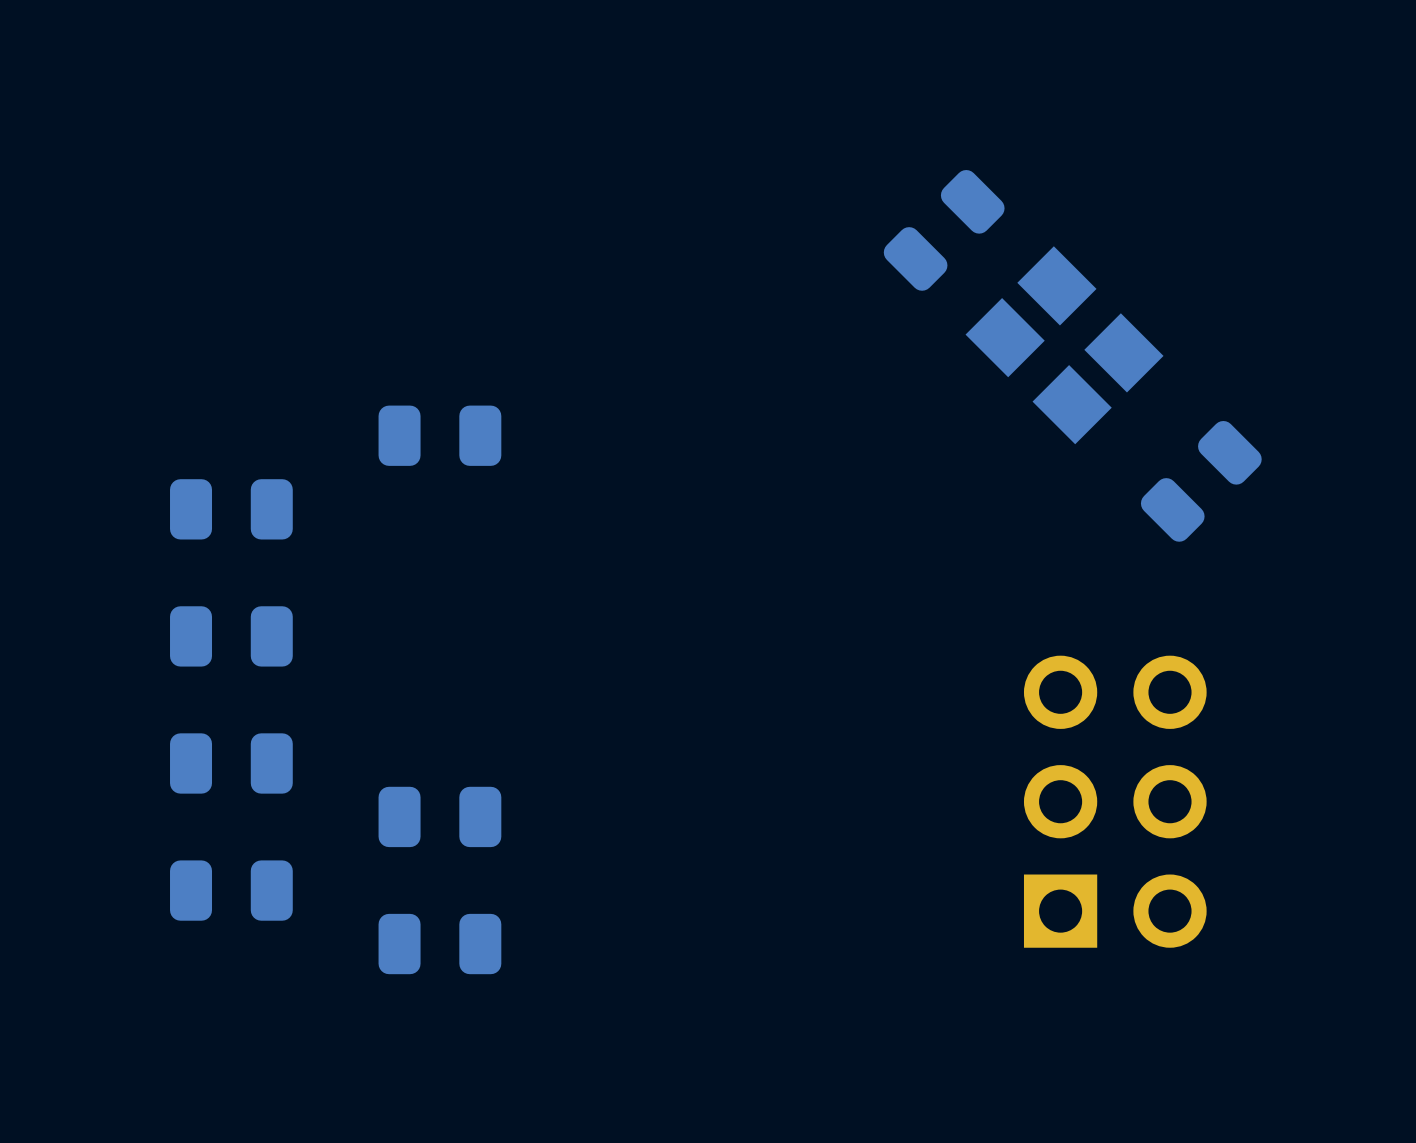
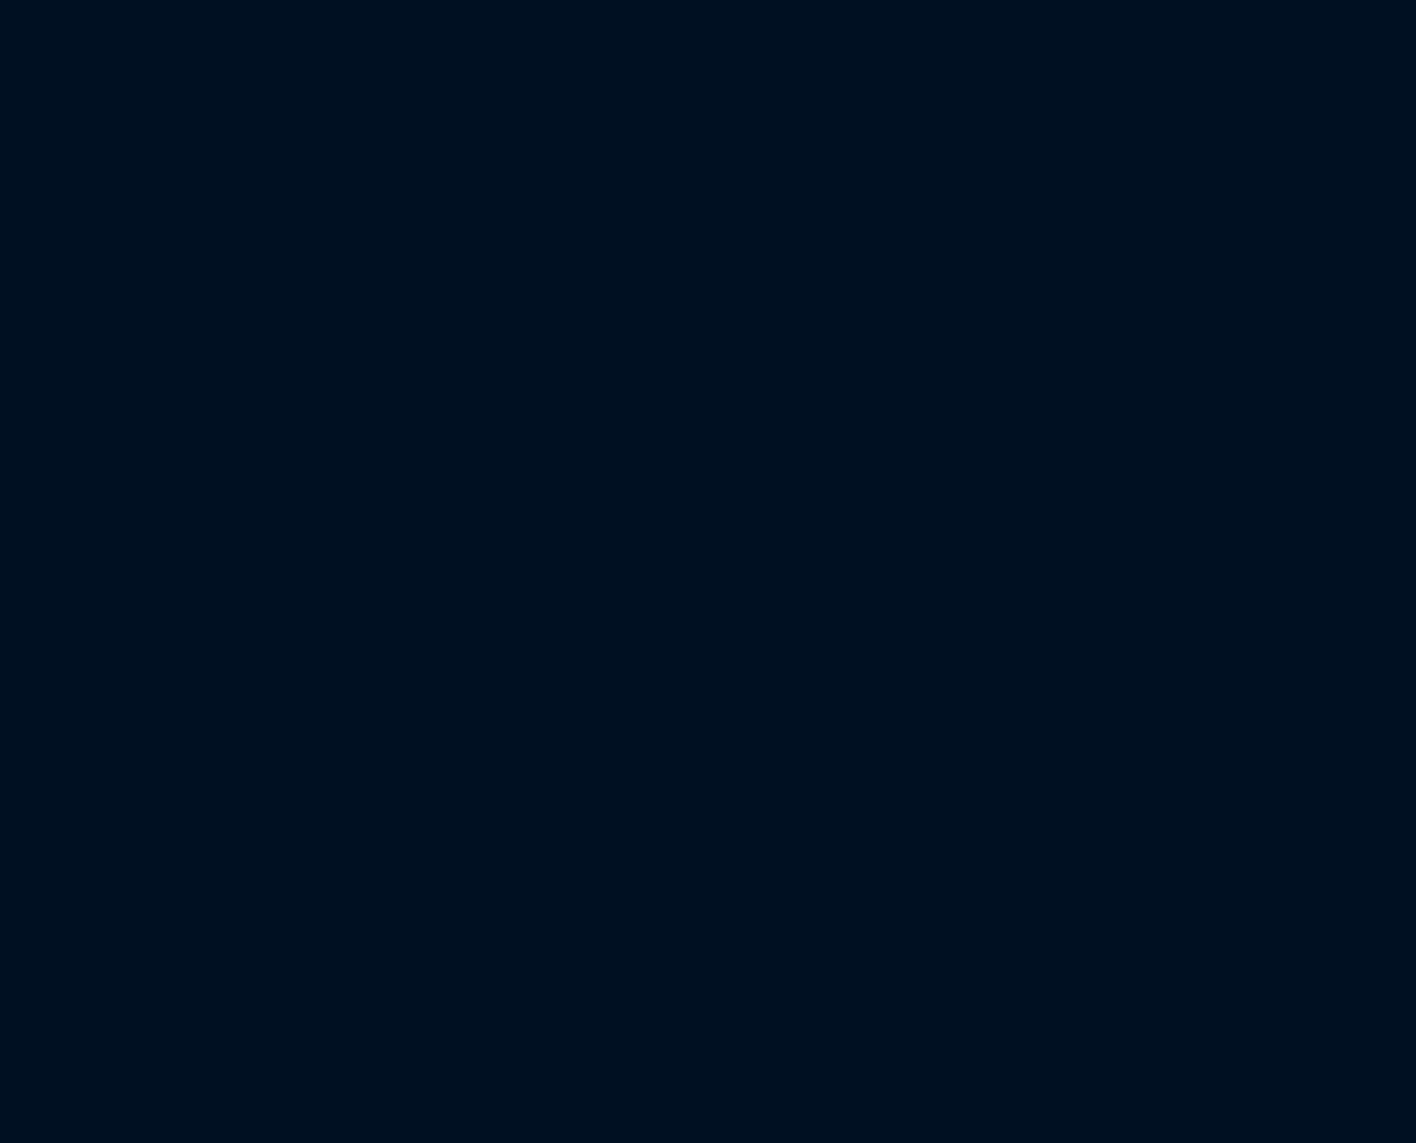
part: (944, 230) -> none
part: (1064, 345) -> none
part: (439, 435) -> none
part: (1201, 481) -> none
part: (231, 509) -> none
part: (231, 636) -> none
part: (231, 763) -> none
part: (1115, 801) -> none
part: (439, 816) -> none
part: (231, 890) -> none
part: (439, 944) -> none

